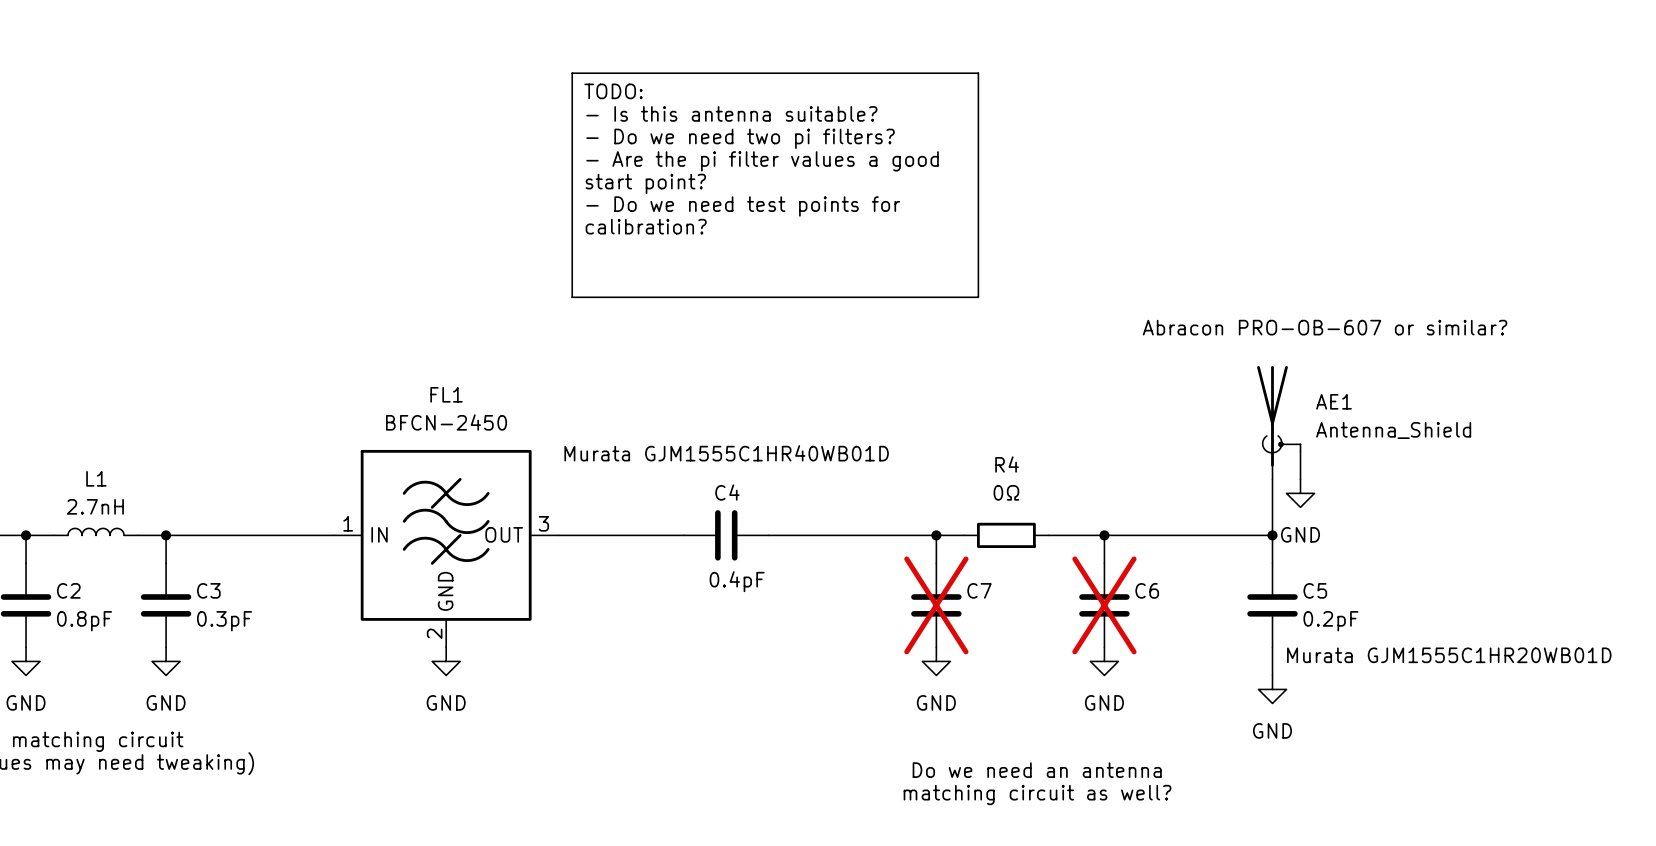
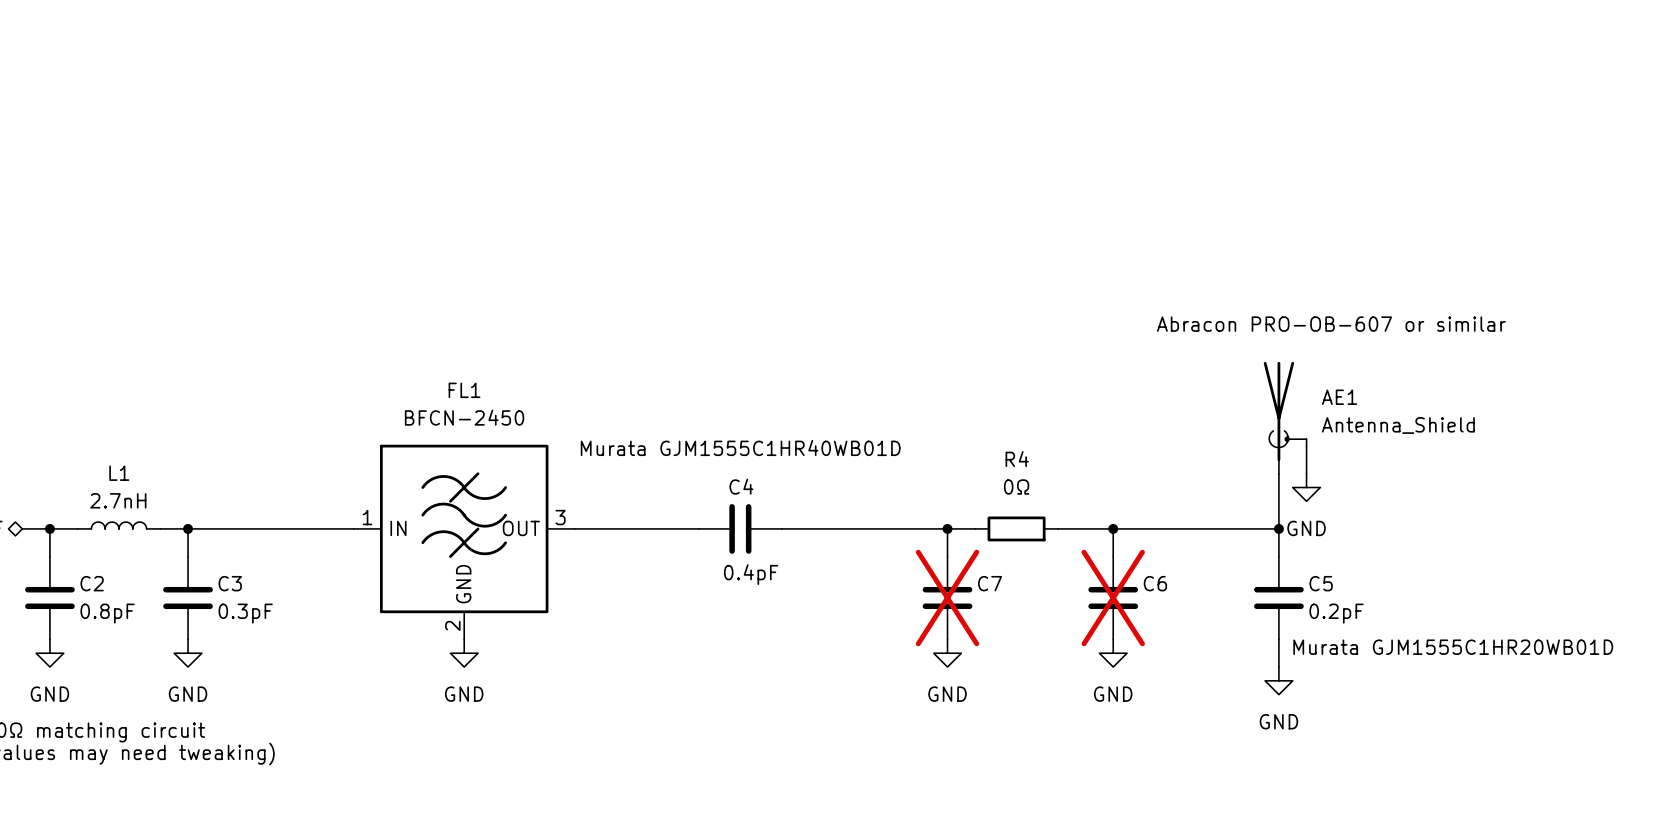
line: (572, 73) (978, 73) (978, 297) (572, 297) (572, 73) -> none
text: TODO: (613, 91) -> none
text: - Is this antenna suitable? (731, 113) -> none
text: - Do we need two pi filters? (740, 138) -> none
text: - Are the pi filter values a good (762, 161) -> none
text: start point? (645, 183) -> none
text: - Do we need test points for (743, 206) -> none
text: calibration? (646, 226) -> none
text: Abracon PRO-OB-607 or similar? (1325, 327) -> Abracon PRO-OB-607 or similar (1331, 324)
text: Do we need an antenna (1037, 770) -> none
text: matching circuit as well? (1037, 795) -> none

